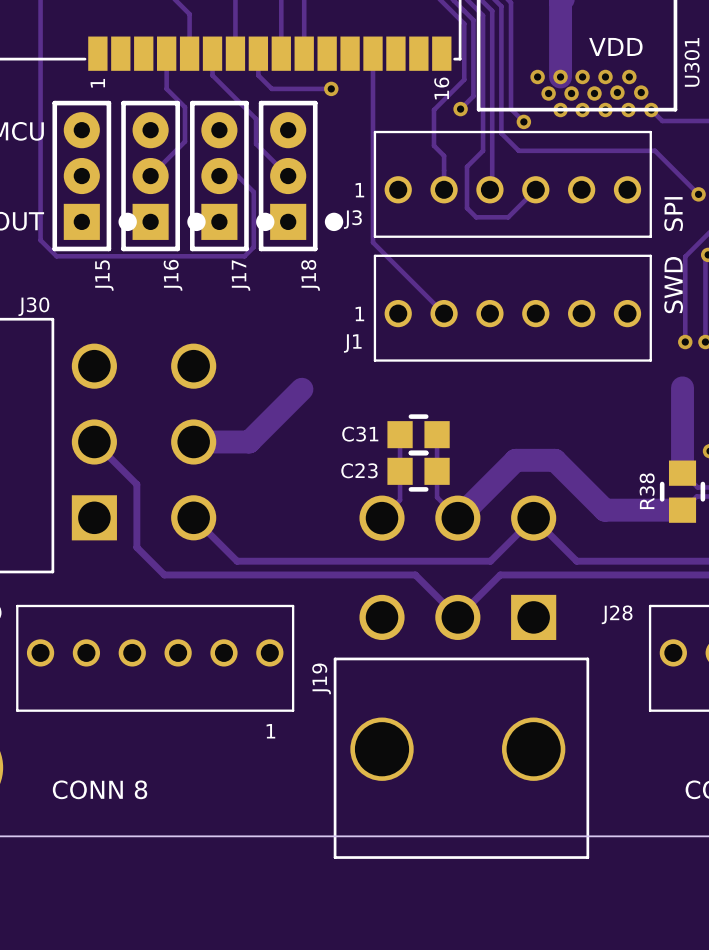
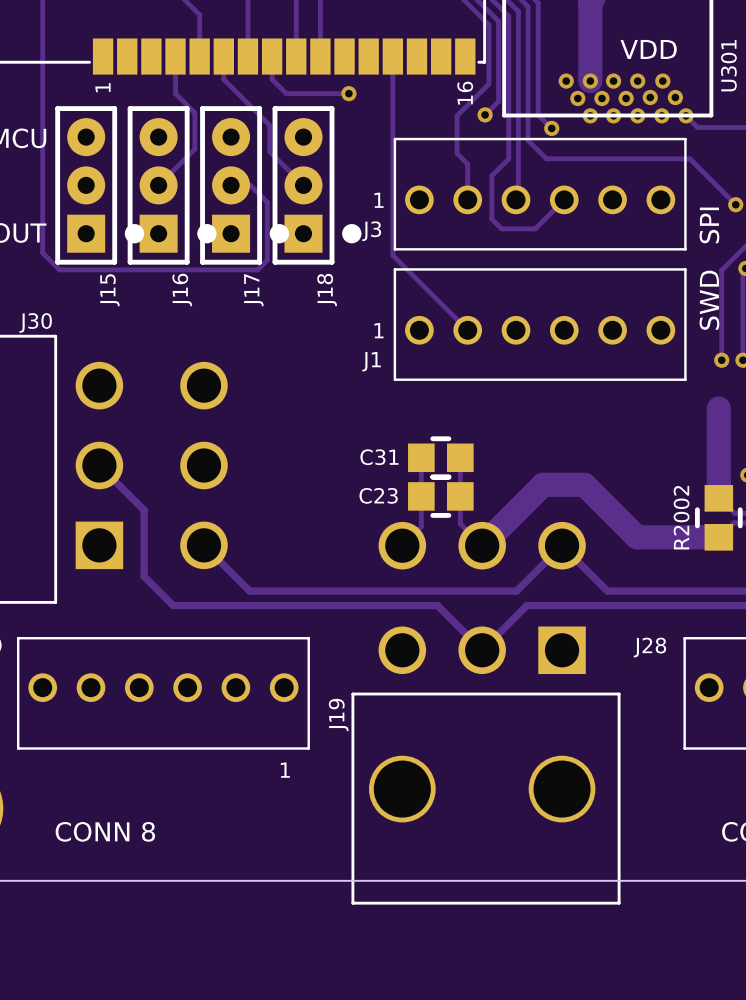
track: (301, 389) (249, 441) (193, 441) -> none
R38 name: R38 (647, 491) -> R2002 (681, 517)

